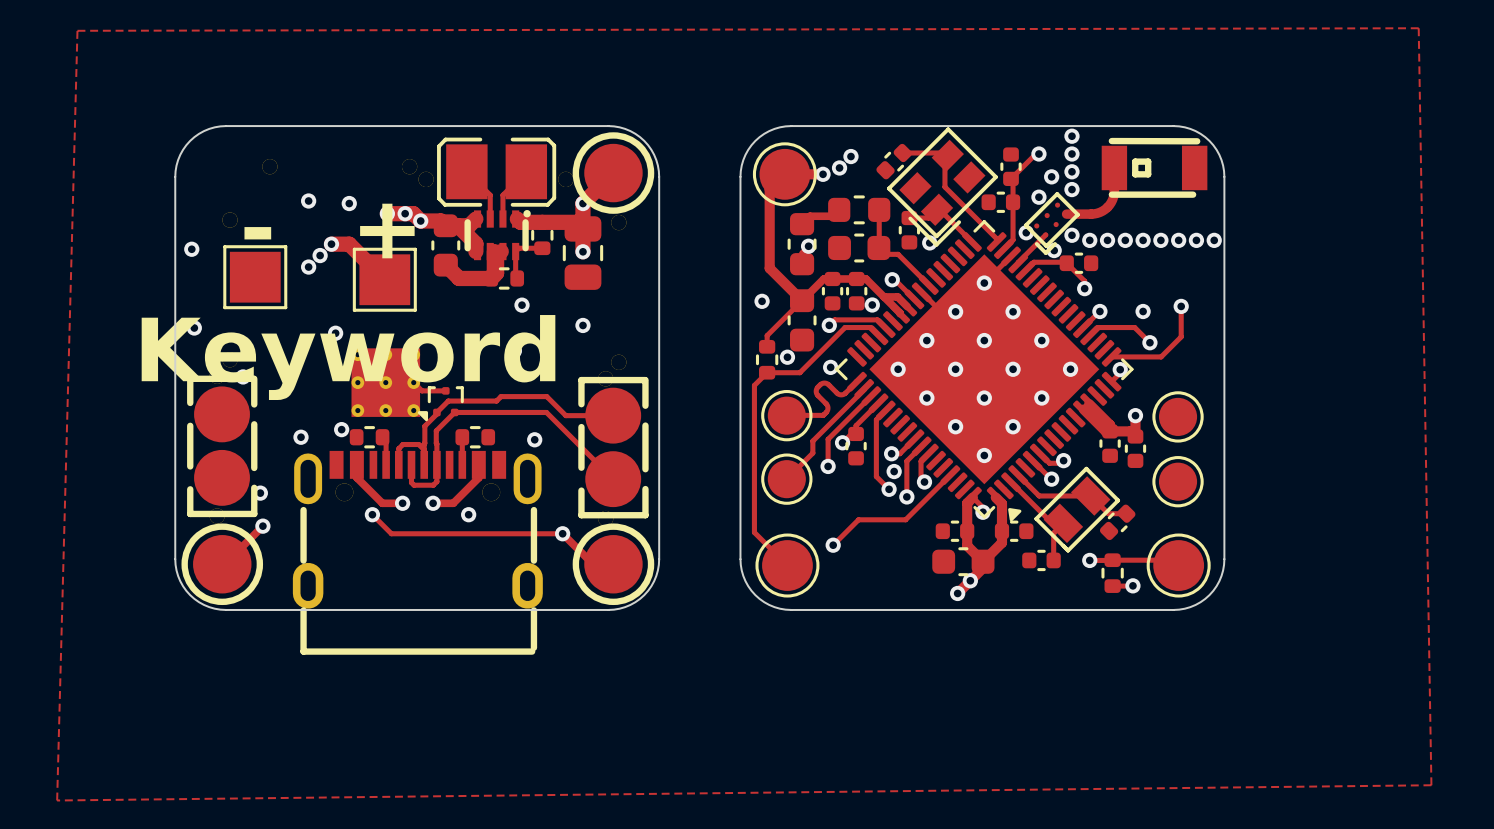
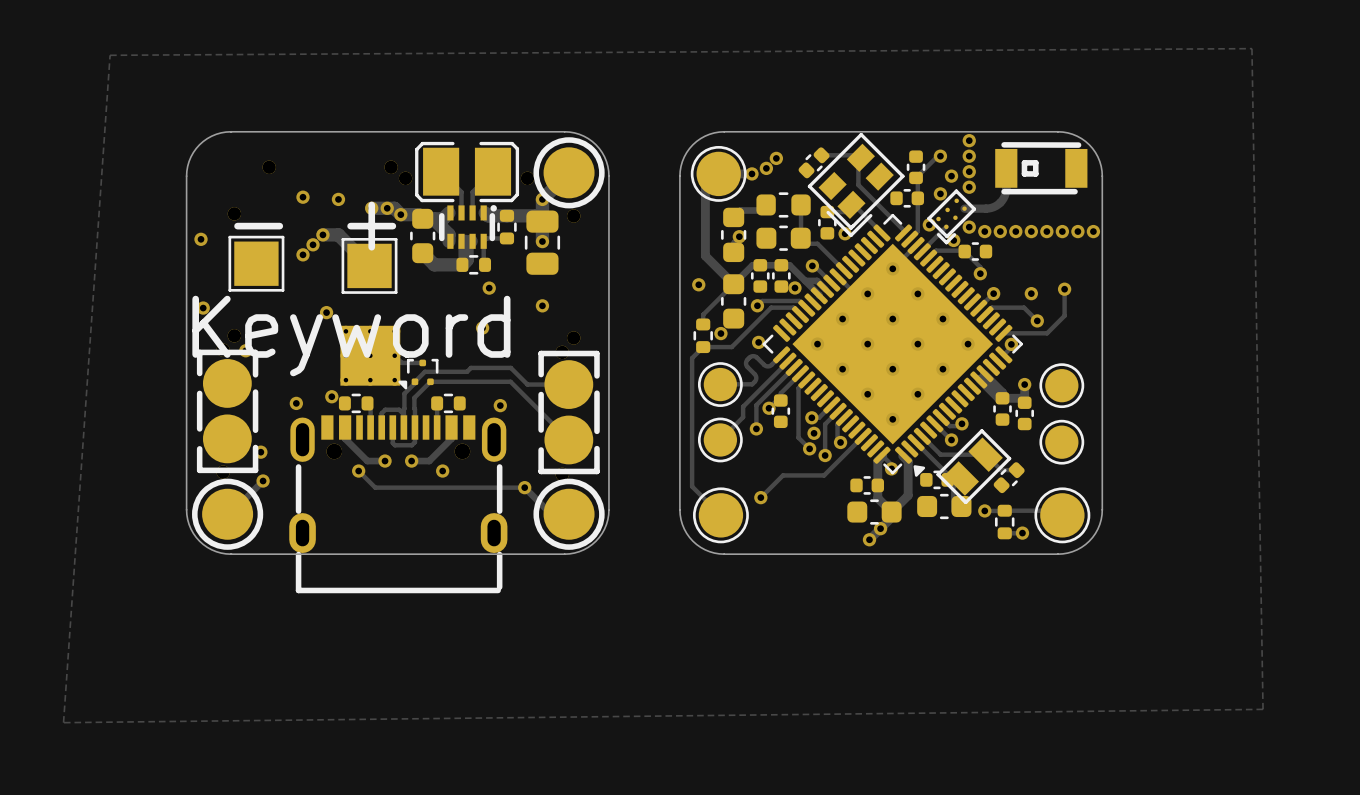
zone outline: (1418, 28) (77, 30) (57, 800) (1431, 785) (1418, 28) -> (1251, 48) (110, 55) (63, 722) (1263, 709) (1251, 48)
part position: (1014, 531) -> (937, 479)
part footprint: [1022, 549, 1061, 572] -> [917, 493, 972, 520]

